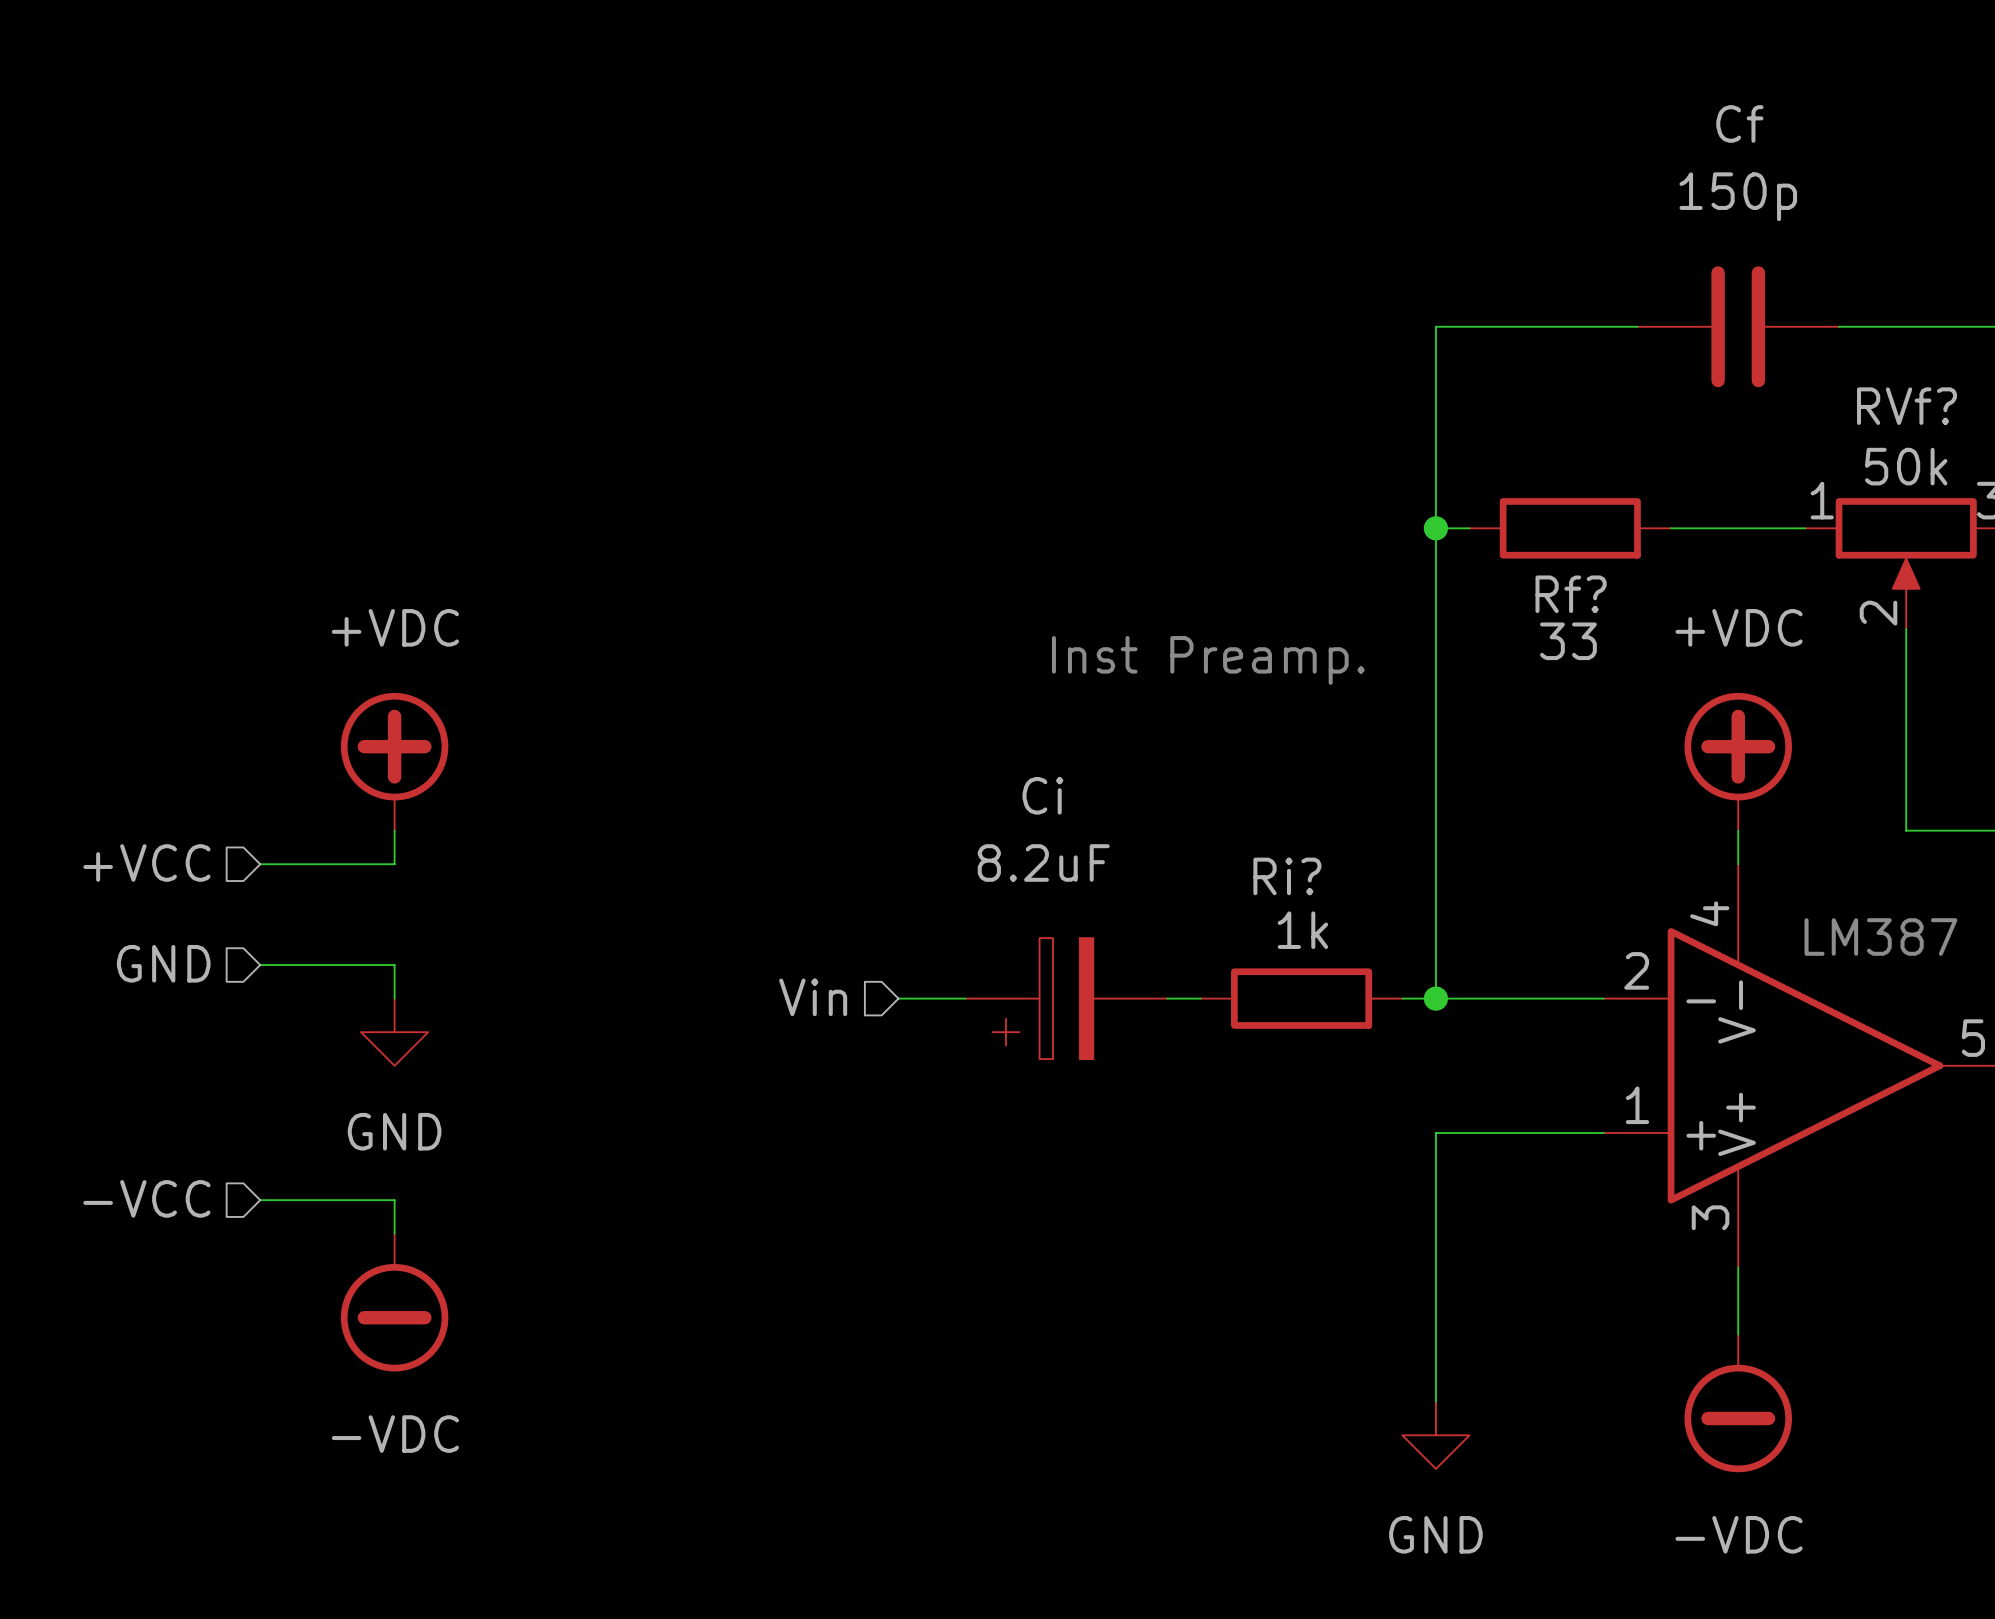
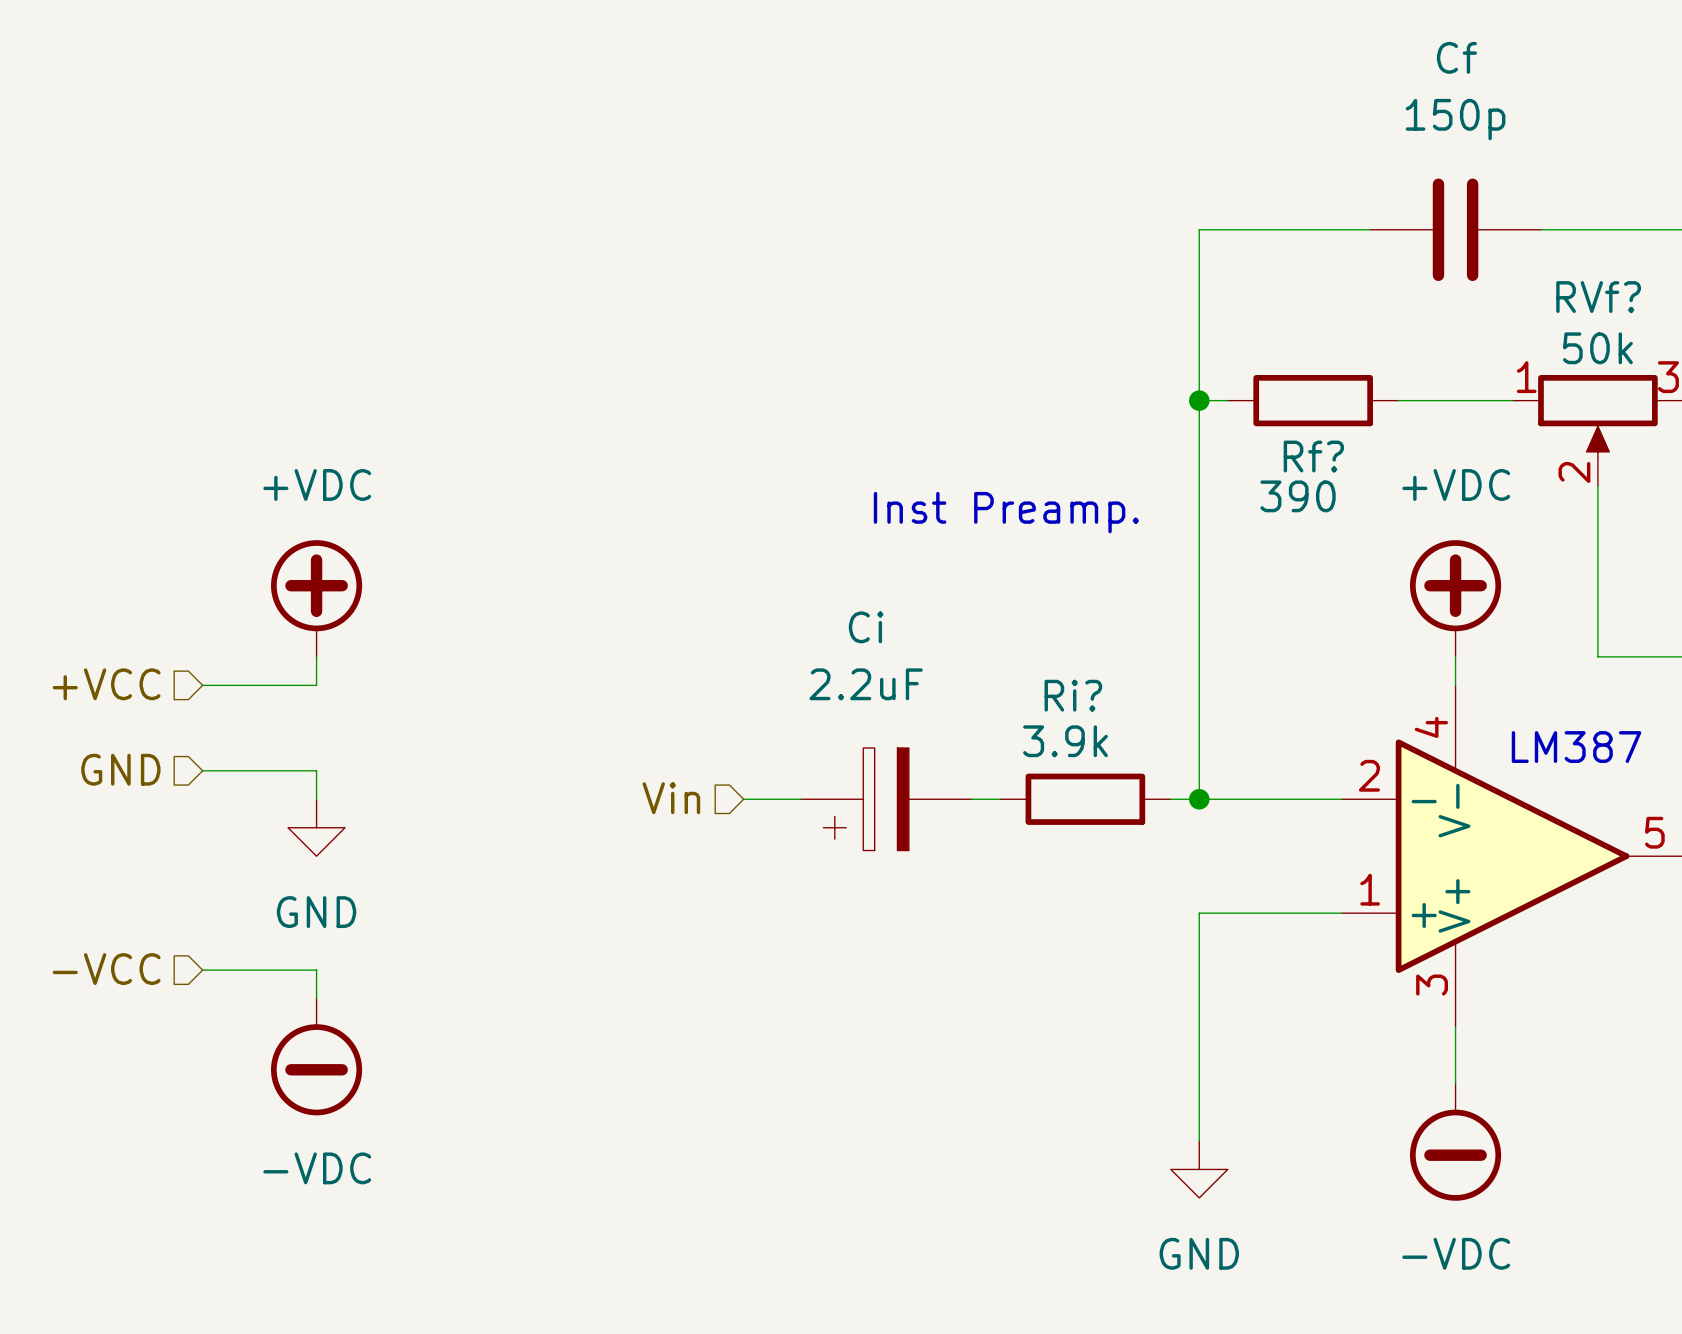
Rf? value: 33 (1568, 641) -> 390 (1298, 496)
Ci value: 8.2uF (1043, 862) -> 2.2uF (866, 684)
Ri? value: 1k (1302, 930) -> 3.9k (1065, 741)

